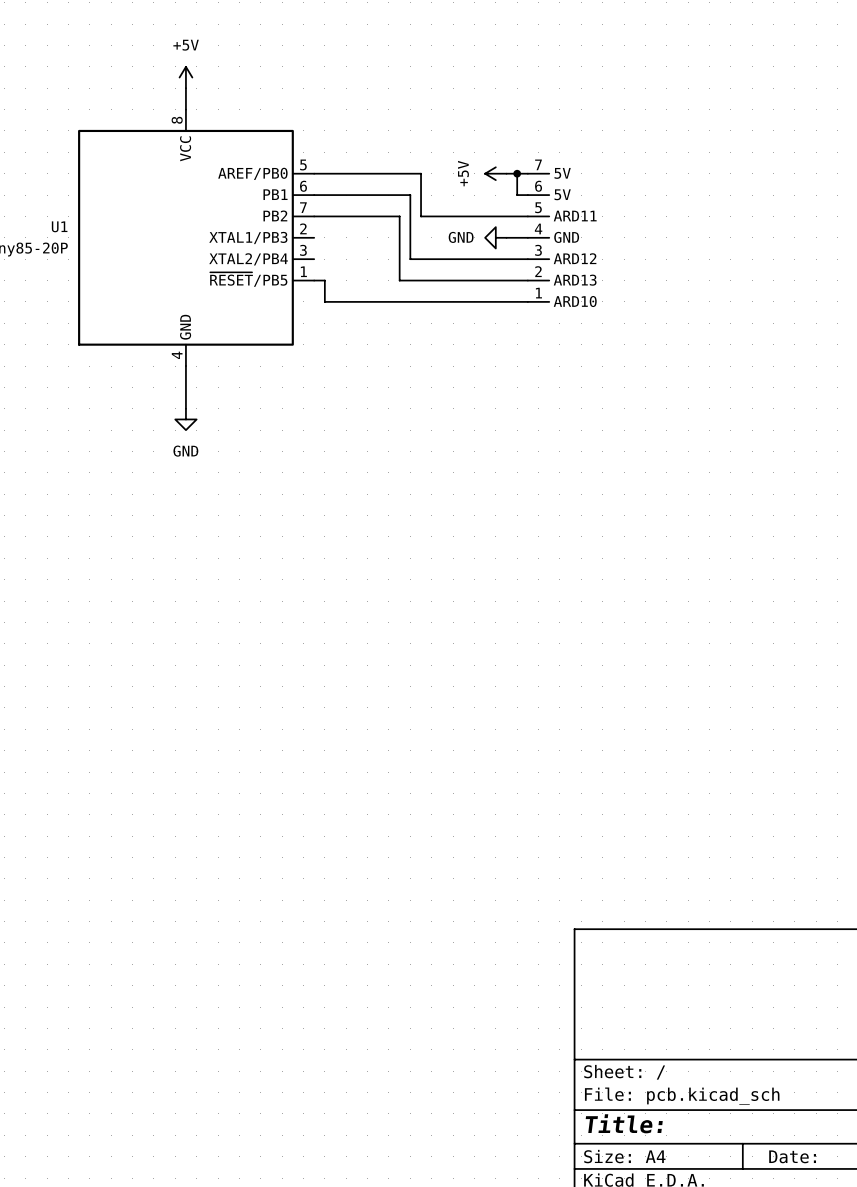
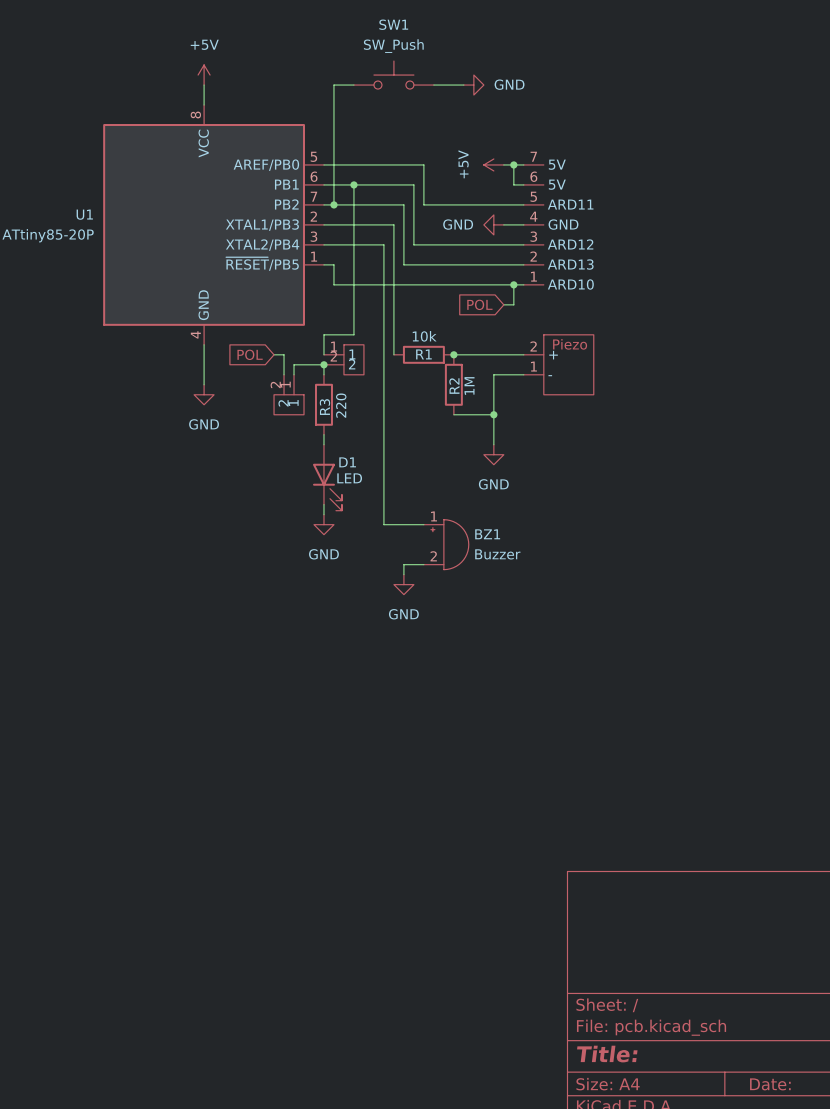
SW1: none -> SW_Push (393, 75)
wire: none -> (353, 85) (333, 85) (333, 204)
wire: none -> (433, 85) (463, 85)
power symbol: none -> GND (473, 85)
wire: none -> (353, 184) (353, 334) (323, 334) (323, 354)
junction: none -> (353, 184)
junction: none -> (333, 204)
wire: none -> (323, 224) (393, 224) (393, 354)
wire: none -> (323, 244) (383, 244) (383, 524) (423, 524)
wire: none -> (513, 284) (513, 304) (503, 304)
junction: none -> (513, 284)
global label: none -> POL (479, 304)
global label: none -> POL (250, 354)
wire: none -> (274, 354) (284, 354) (284, 374)
R1: none -> 10k (423, 354)
wire: none -> (453, 354) (523, 354)
junction: none -> (453, 354)
part: none -> (343, 359)
junction: none -> (323, 364)
part: none -> (558, 364)
wire: none -> (294, 374) (294, 364) (323, 364) (323, 374)
wire: none -> (523, 374) (493, 374) (493, 444)
R2: none -> 1M (453, 384)
part: none -> (289, 394)
R3: none -> 220 (323, 404)
wire: none -> (453, 414) (493, 414)
junction: none -> (493, 414)
wire: none -> (323, 434) (323, 444)
power symbol: none -> GND (493, 454)
D1: none -> LED (327, 477)
wire: none -> (323, 504) (323, 514)
power symbol: none -> GND (323, 524)
BZ1: none -> Buzzer (446, 544)
wire: none -> (423, 564) (403, 564) (403, 574)
power symbol: none -> GND (403, 584)

